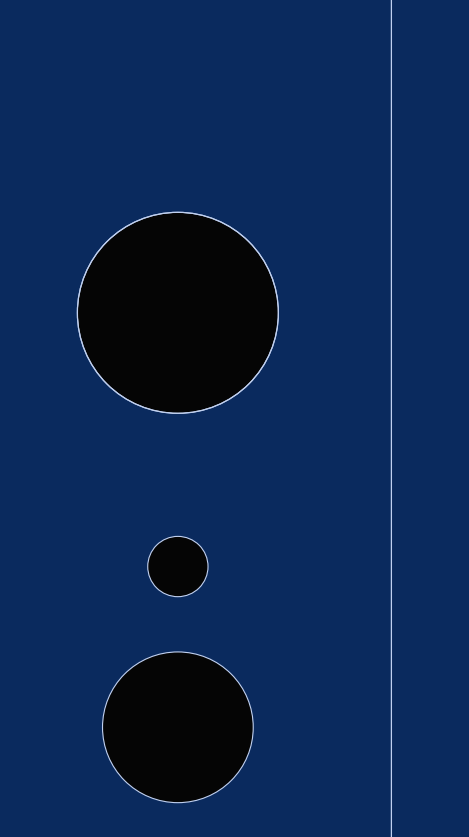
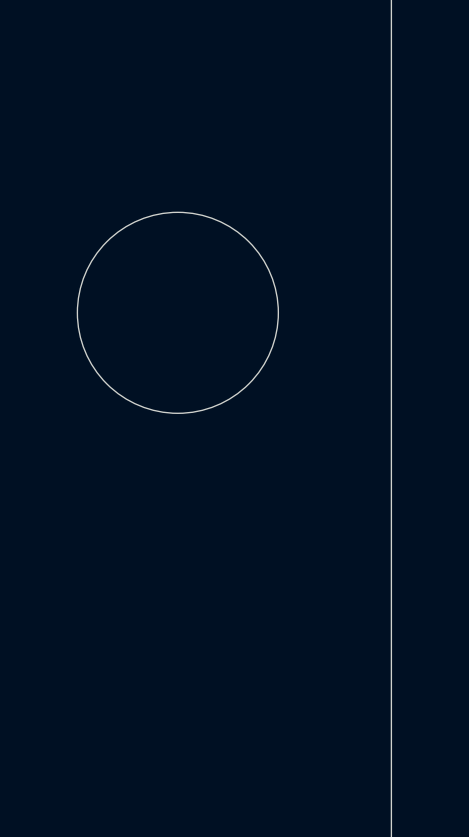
part: (177, 312) -> none
part: (177, 669) -> none

